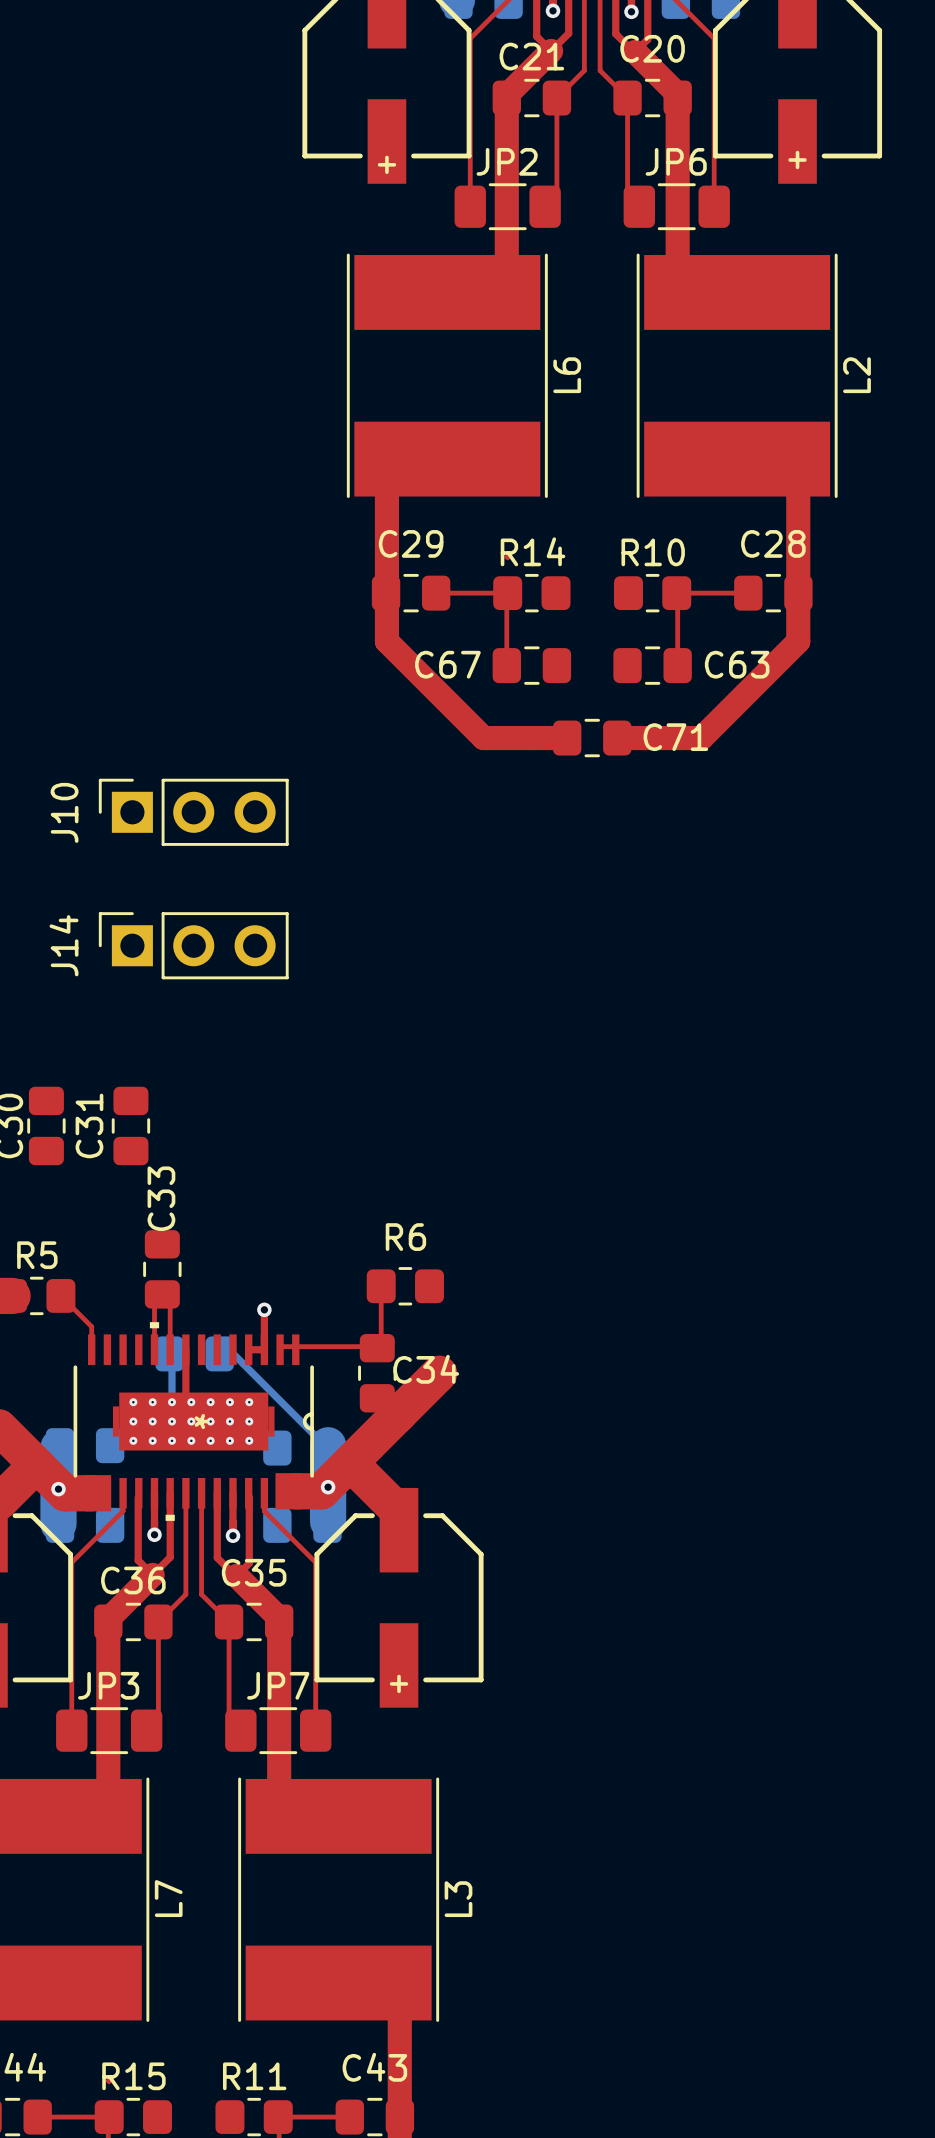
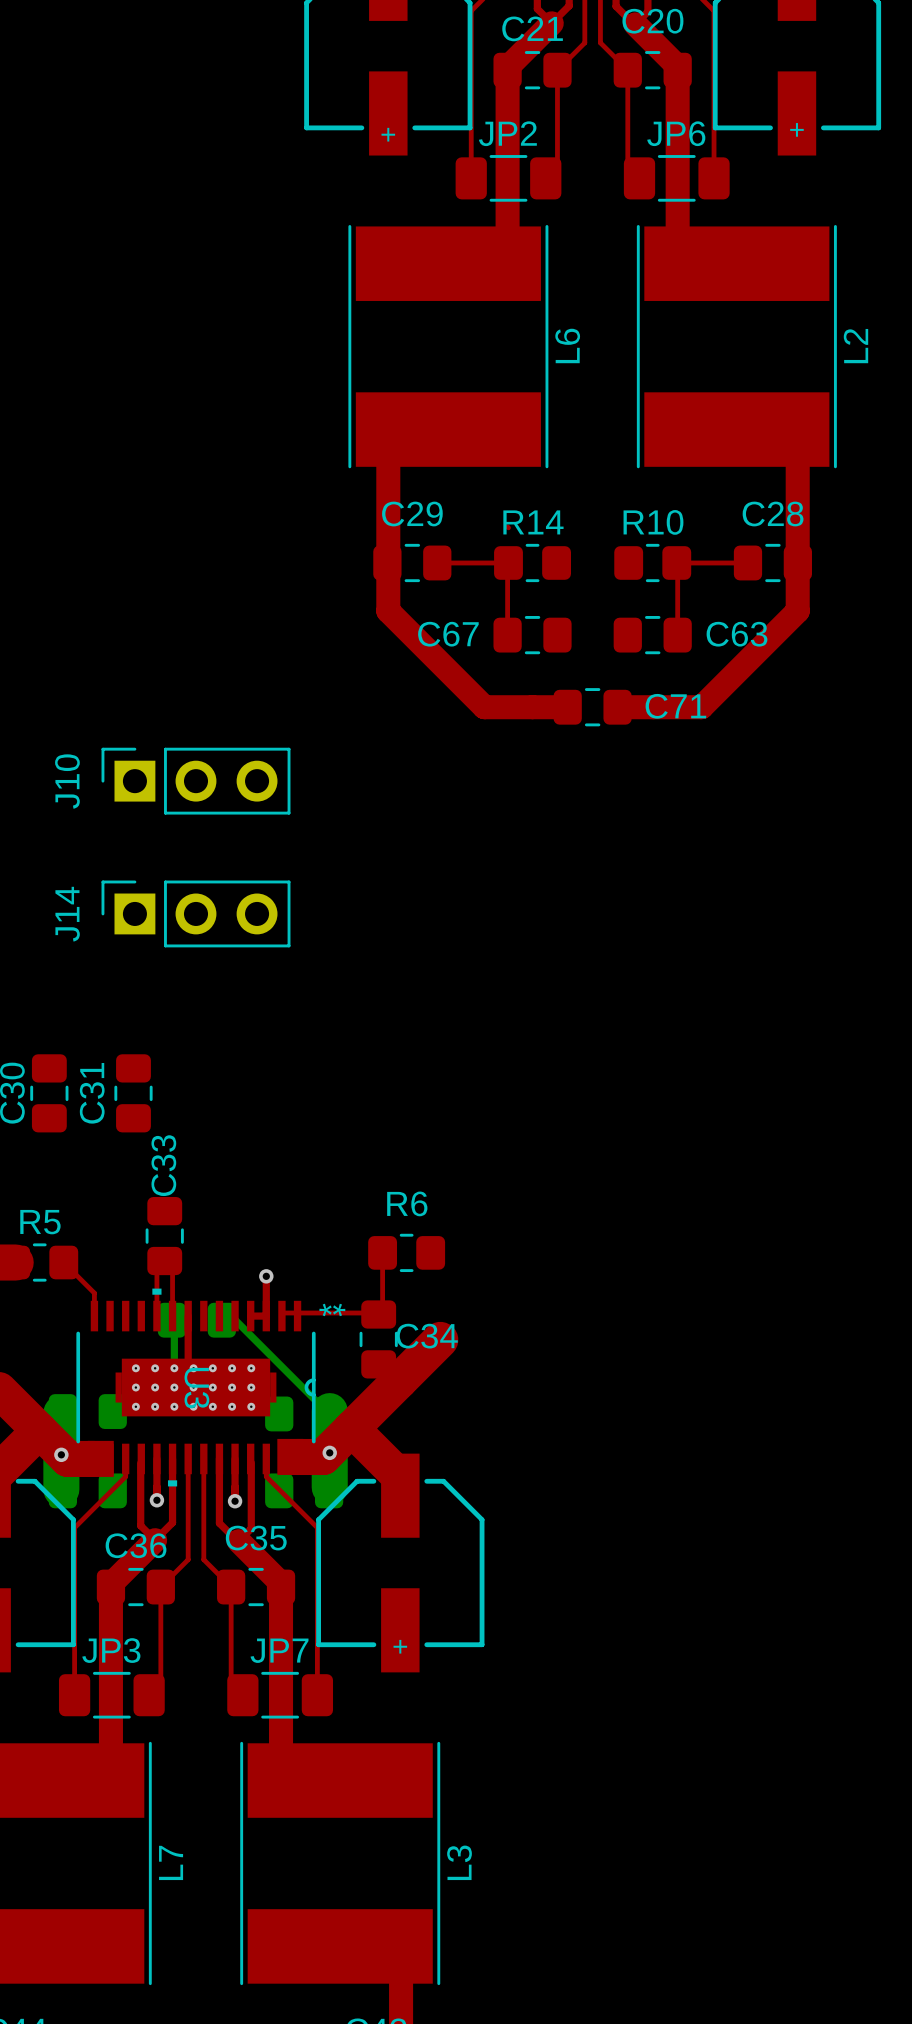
U3 footprint: [73, 1322, 314, 1521] -> [76, 1288, 316, 1487]
U3 name: none -> U3 (196, 1388)

